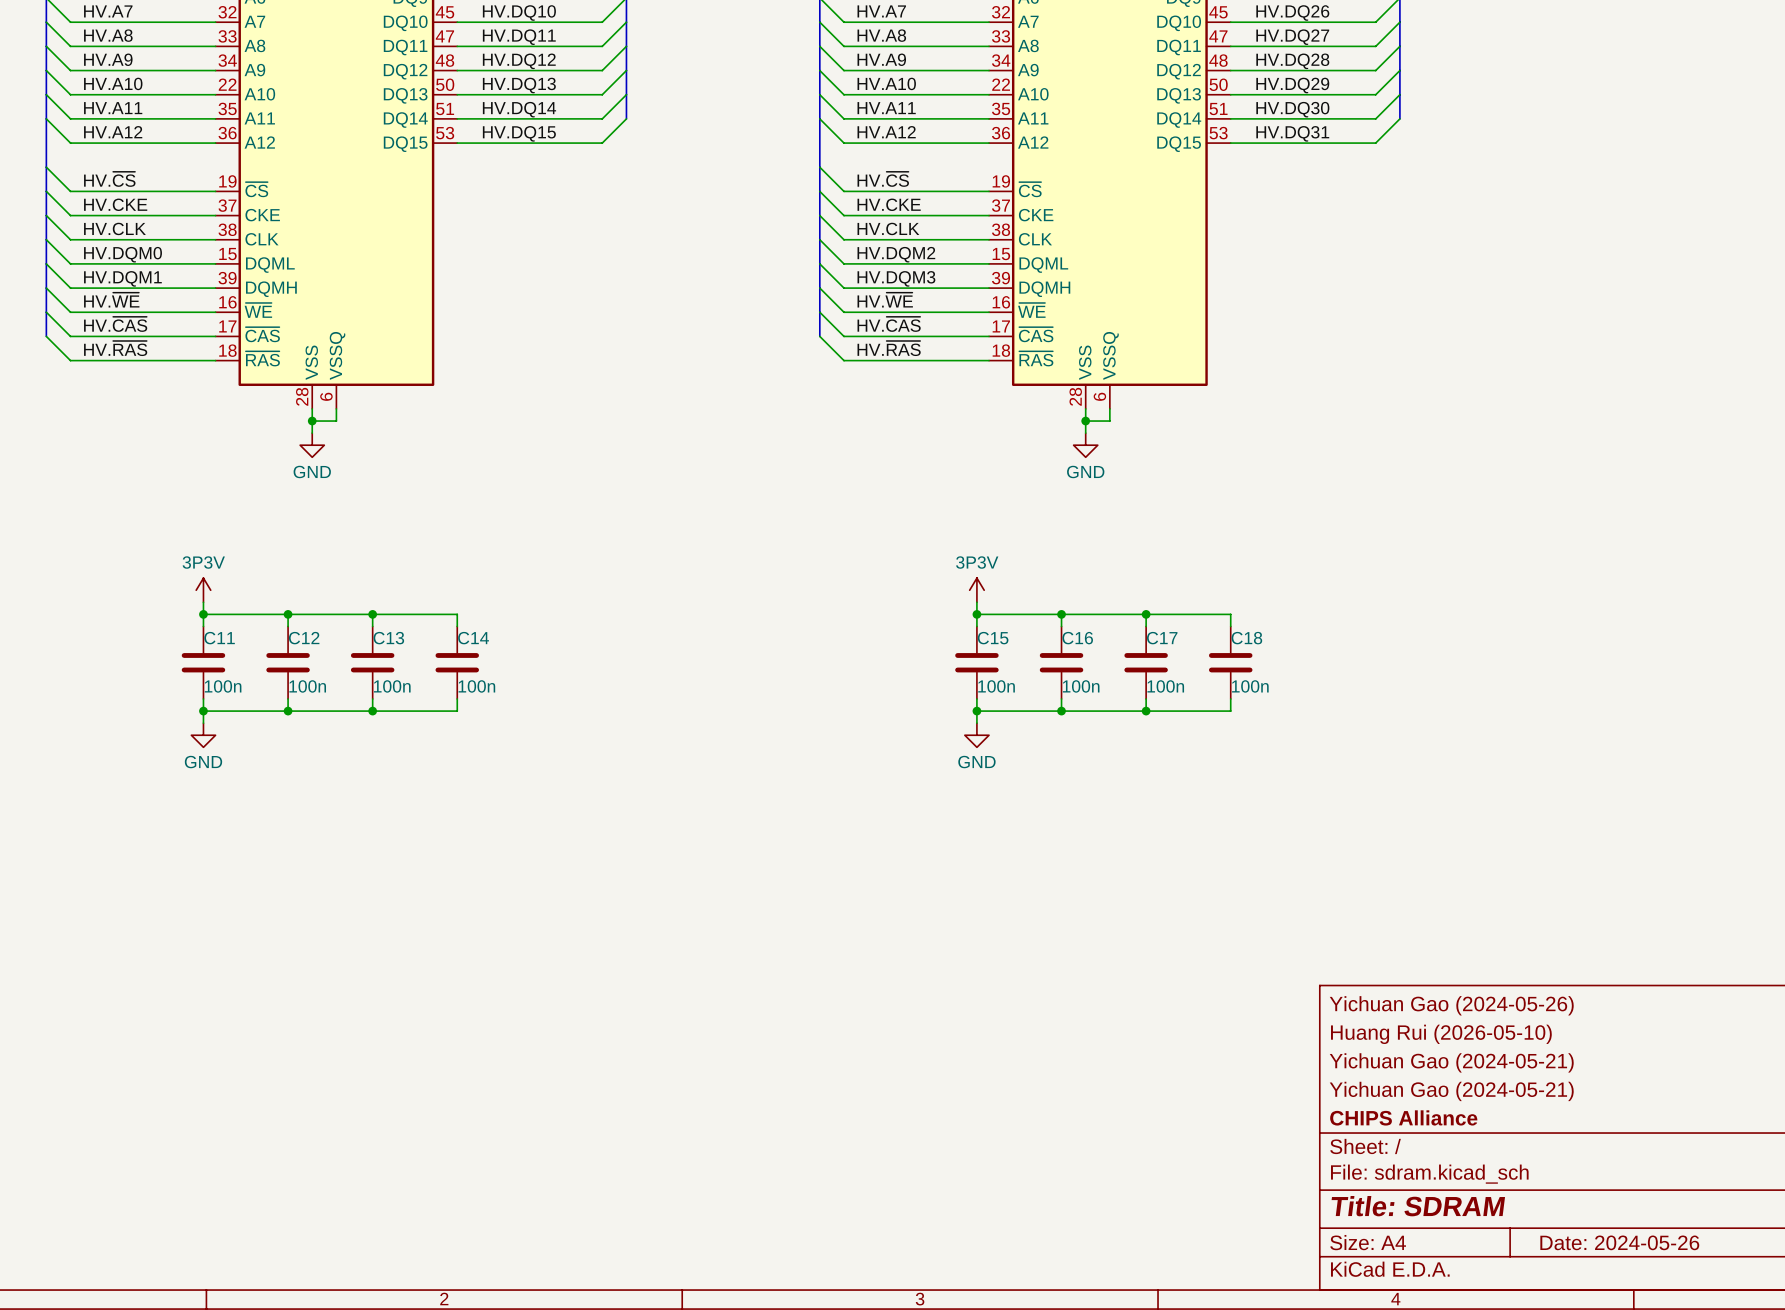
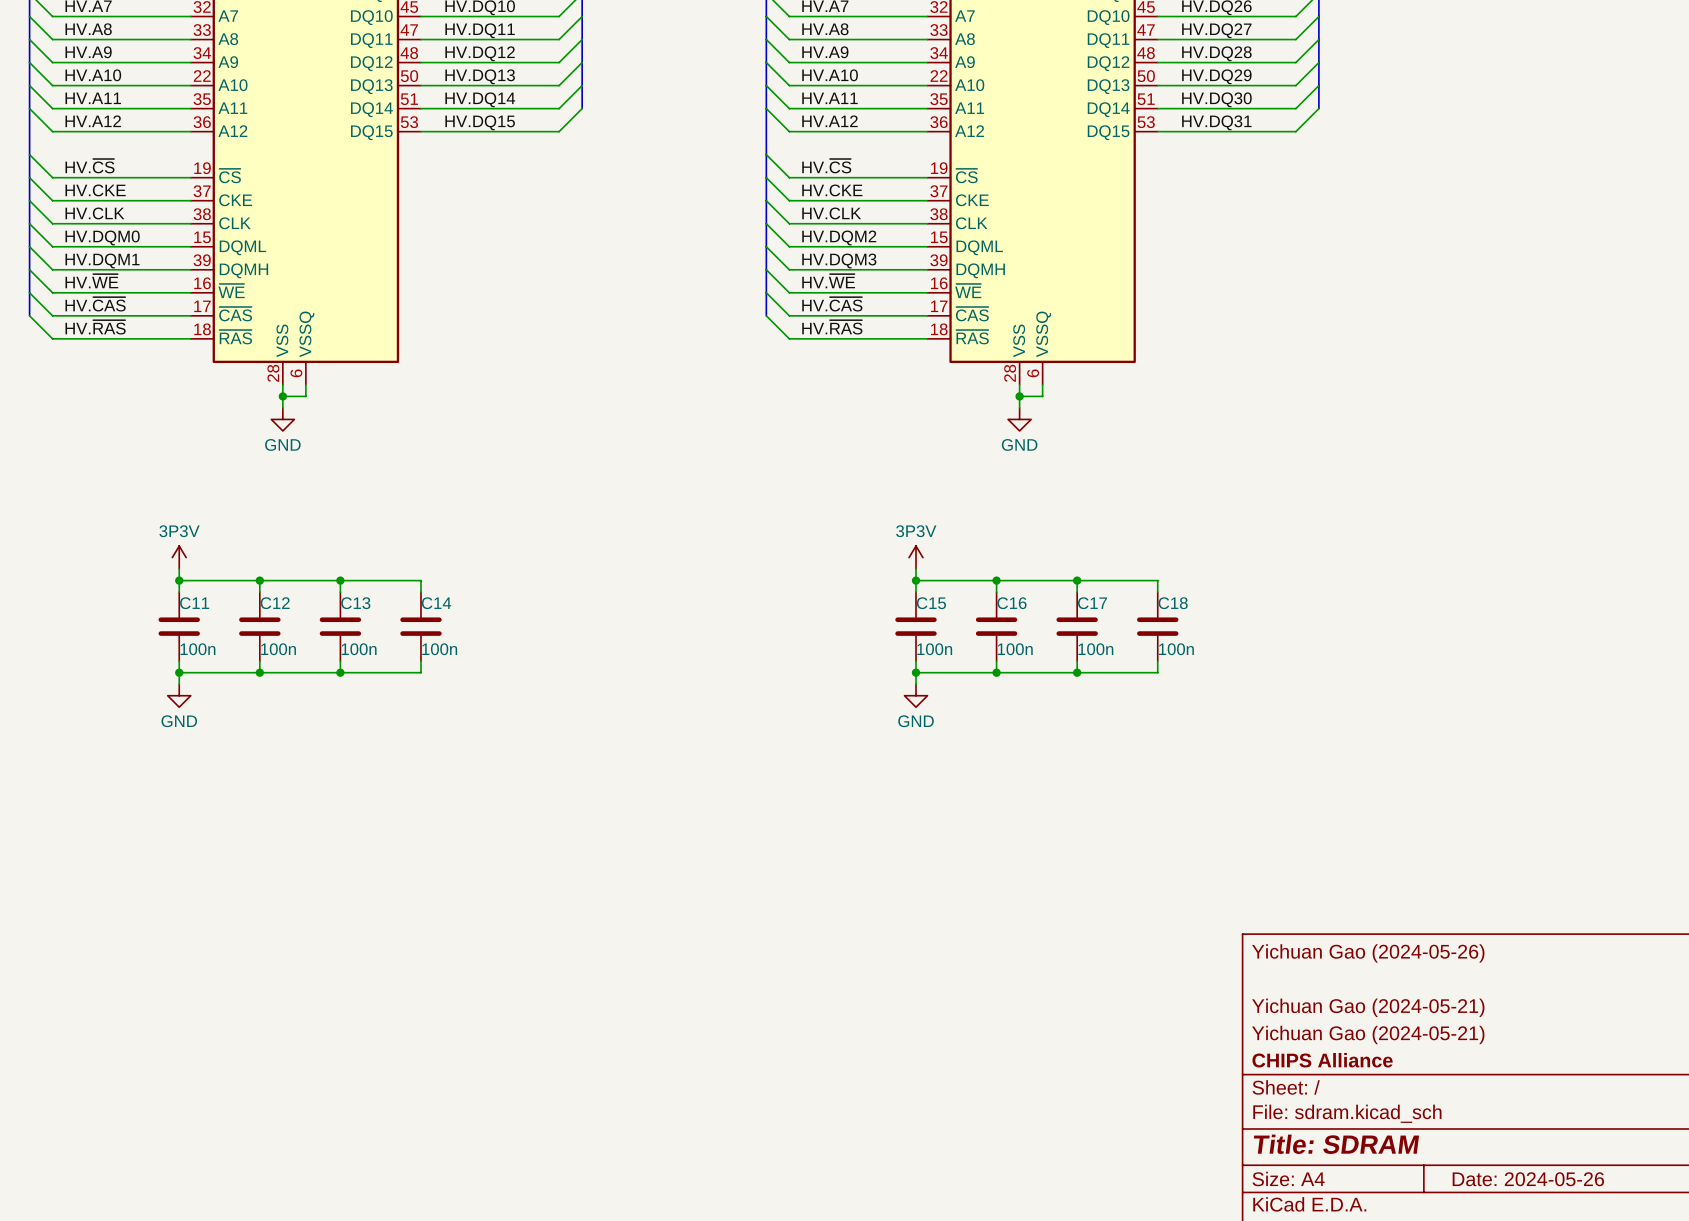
title block: Huang Rui (2026-05-10) (1441, 1034) -> none

